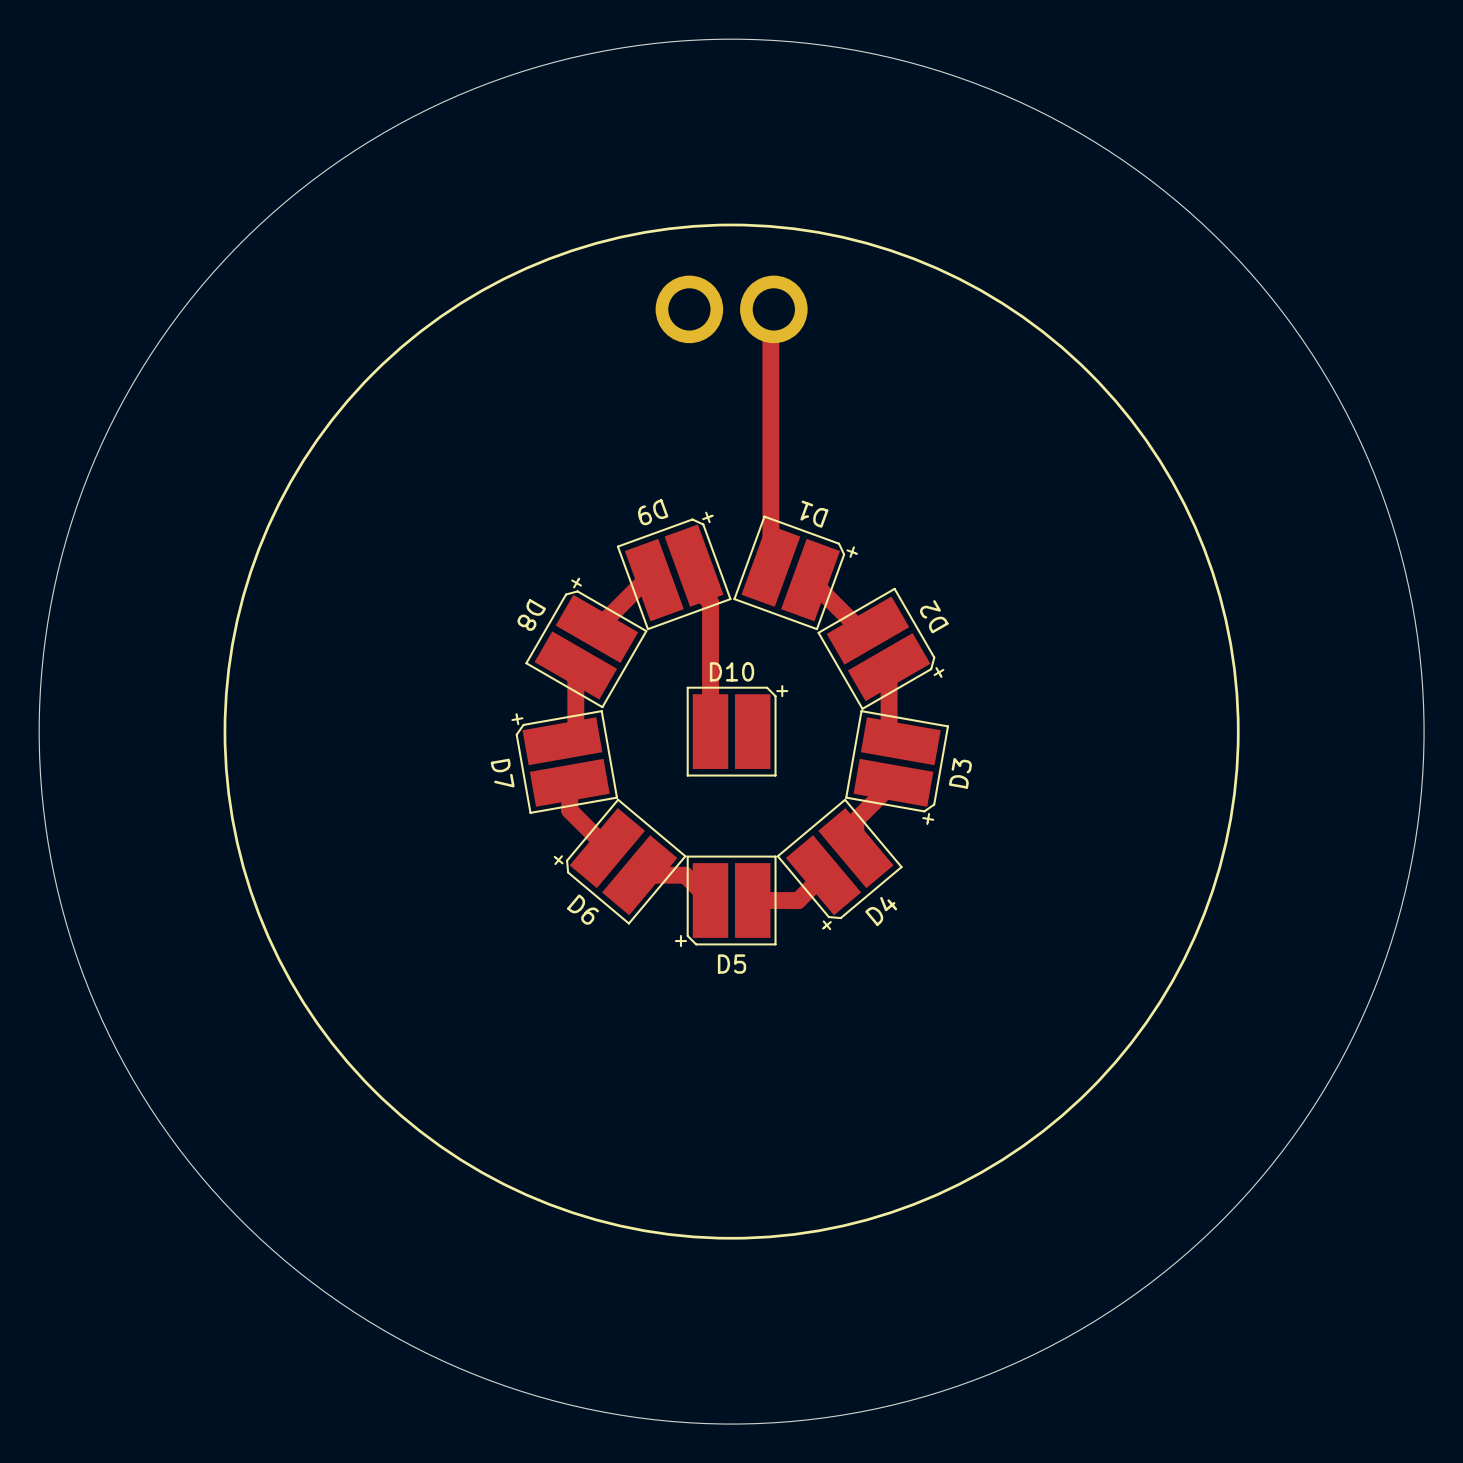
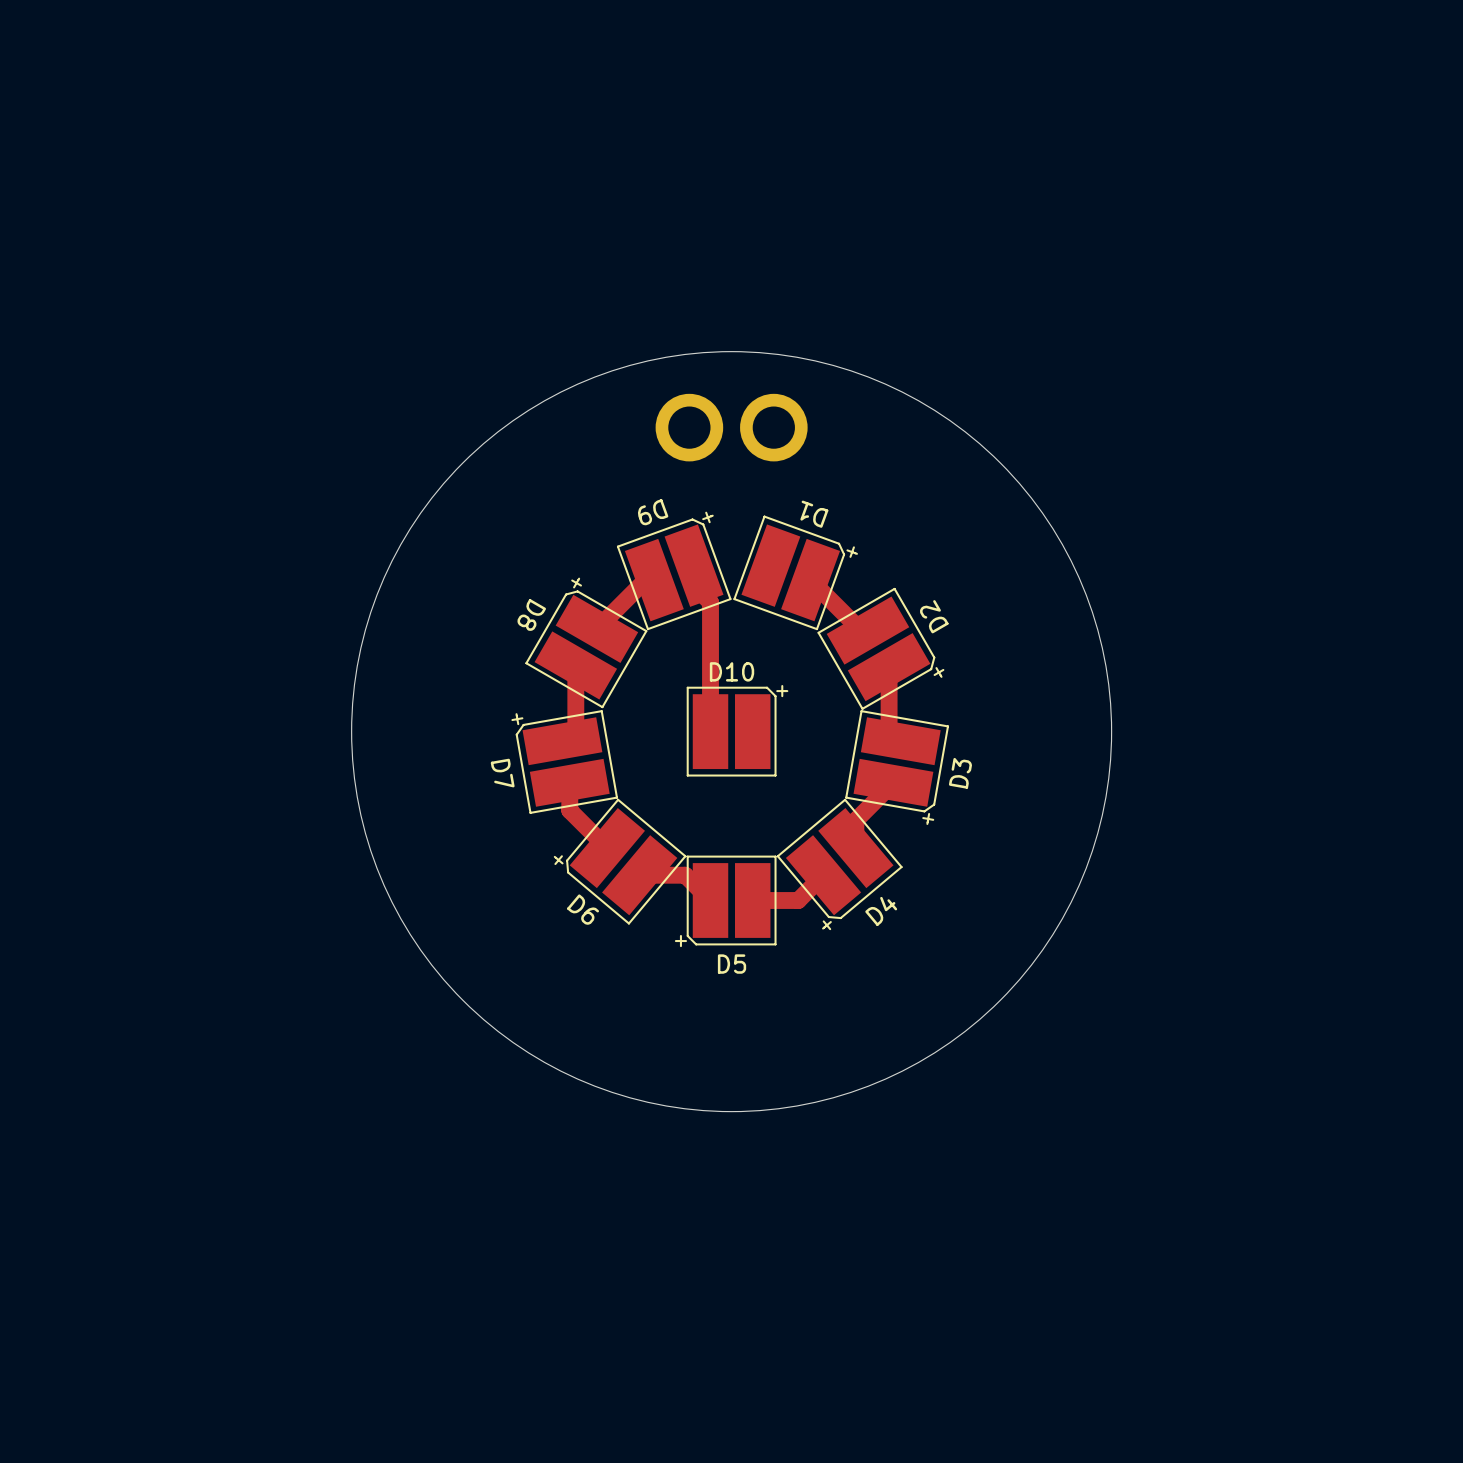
round board edge size: [38, 38, 1425, 1425] -> [351, 351, 1113, 1113]
drawing: [223, 223, 1240, 1240] -> none
part position: (731, 309) -> (731, 427)
top track: (778, 314) (773, 309) (770, 312) (770, 565) -> none

